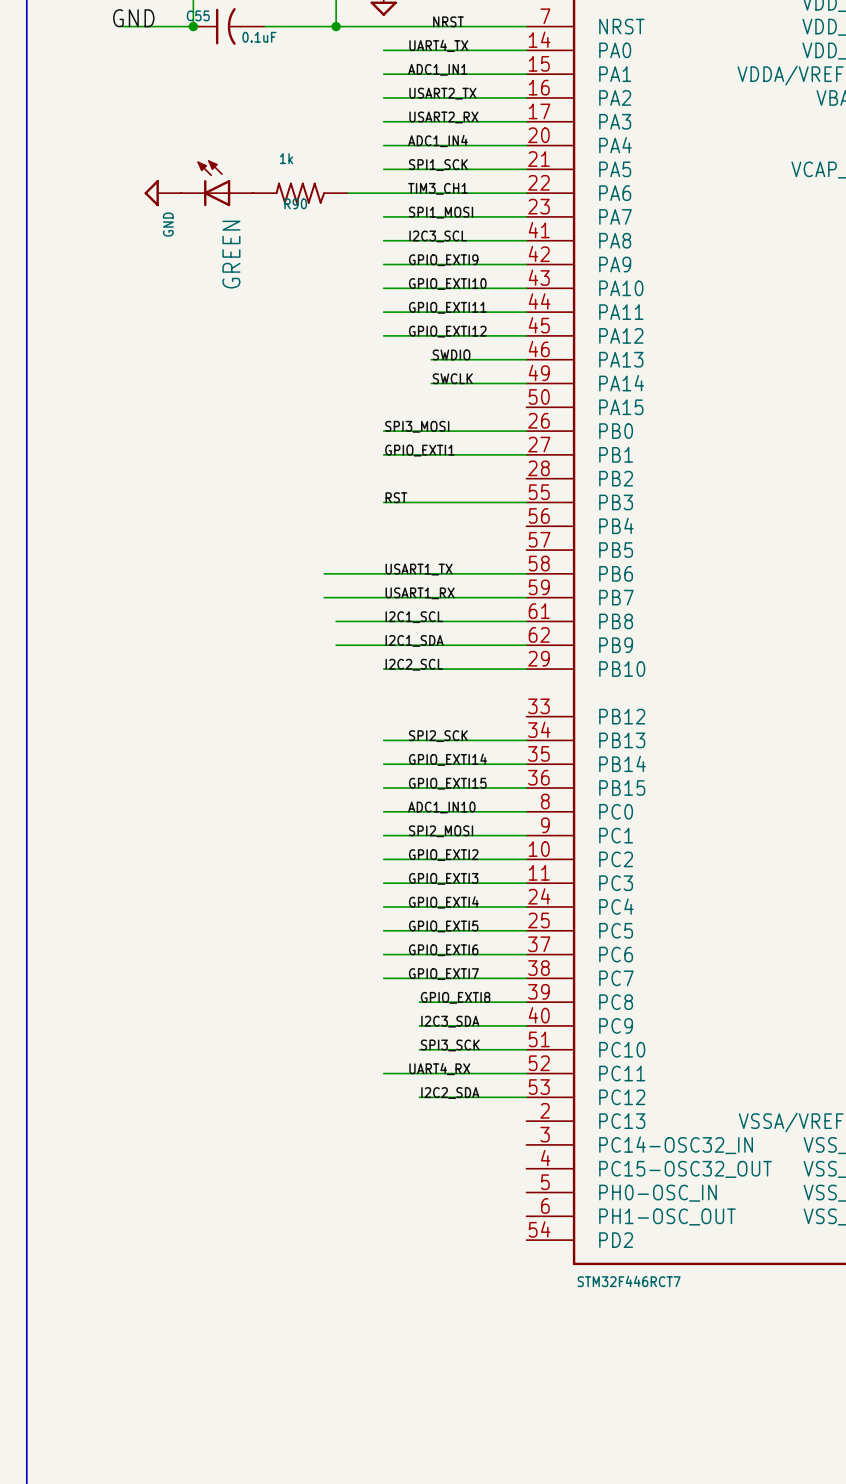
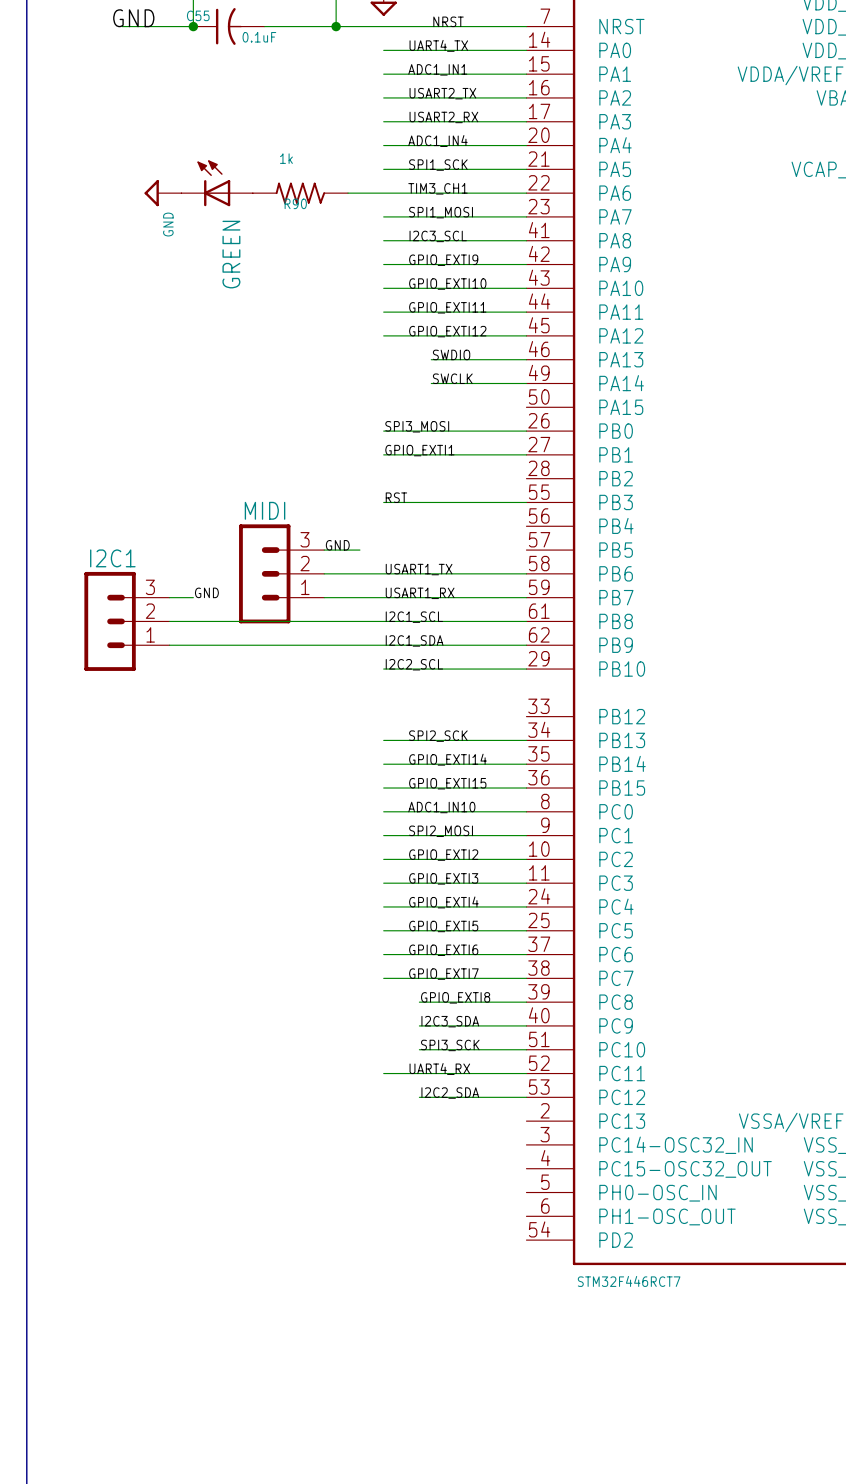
label: none -> GND (337, 545)
wire: none -> (324, 550) (359, 550)
MIDI: none -> (281, 573)
label: none -> GND (206, 592)
wire: none -> (169, 597) (193, 597)
I2C1: none -> (126, 621)
wire: none -> (169, 621) (336, 621)
wire: none -> (169, 645) (336, 645)

